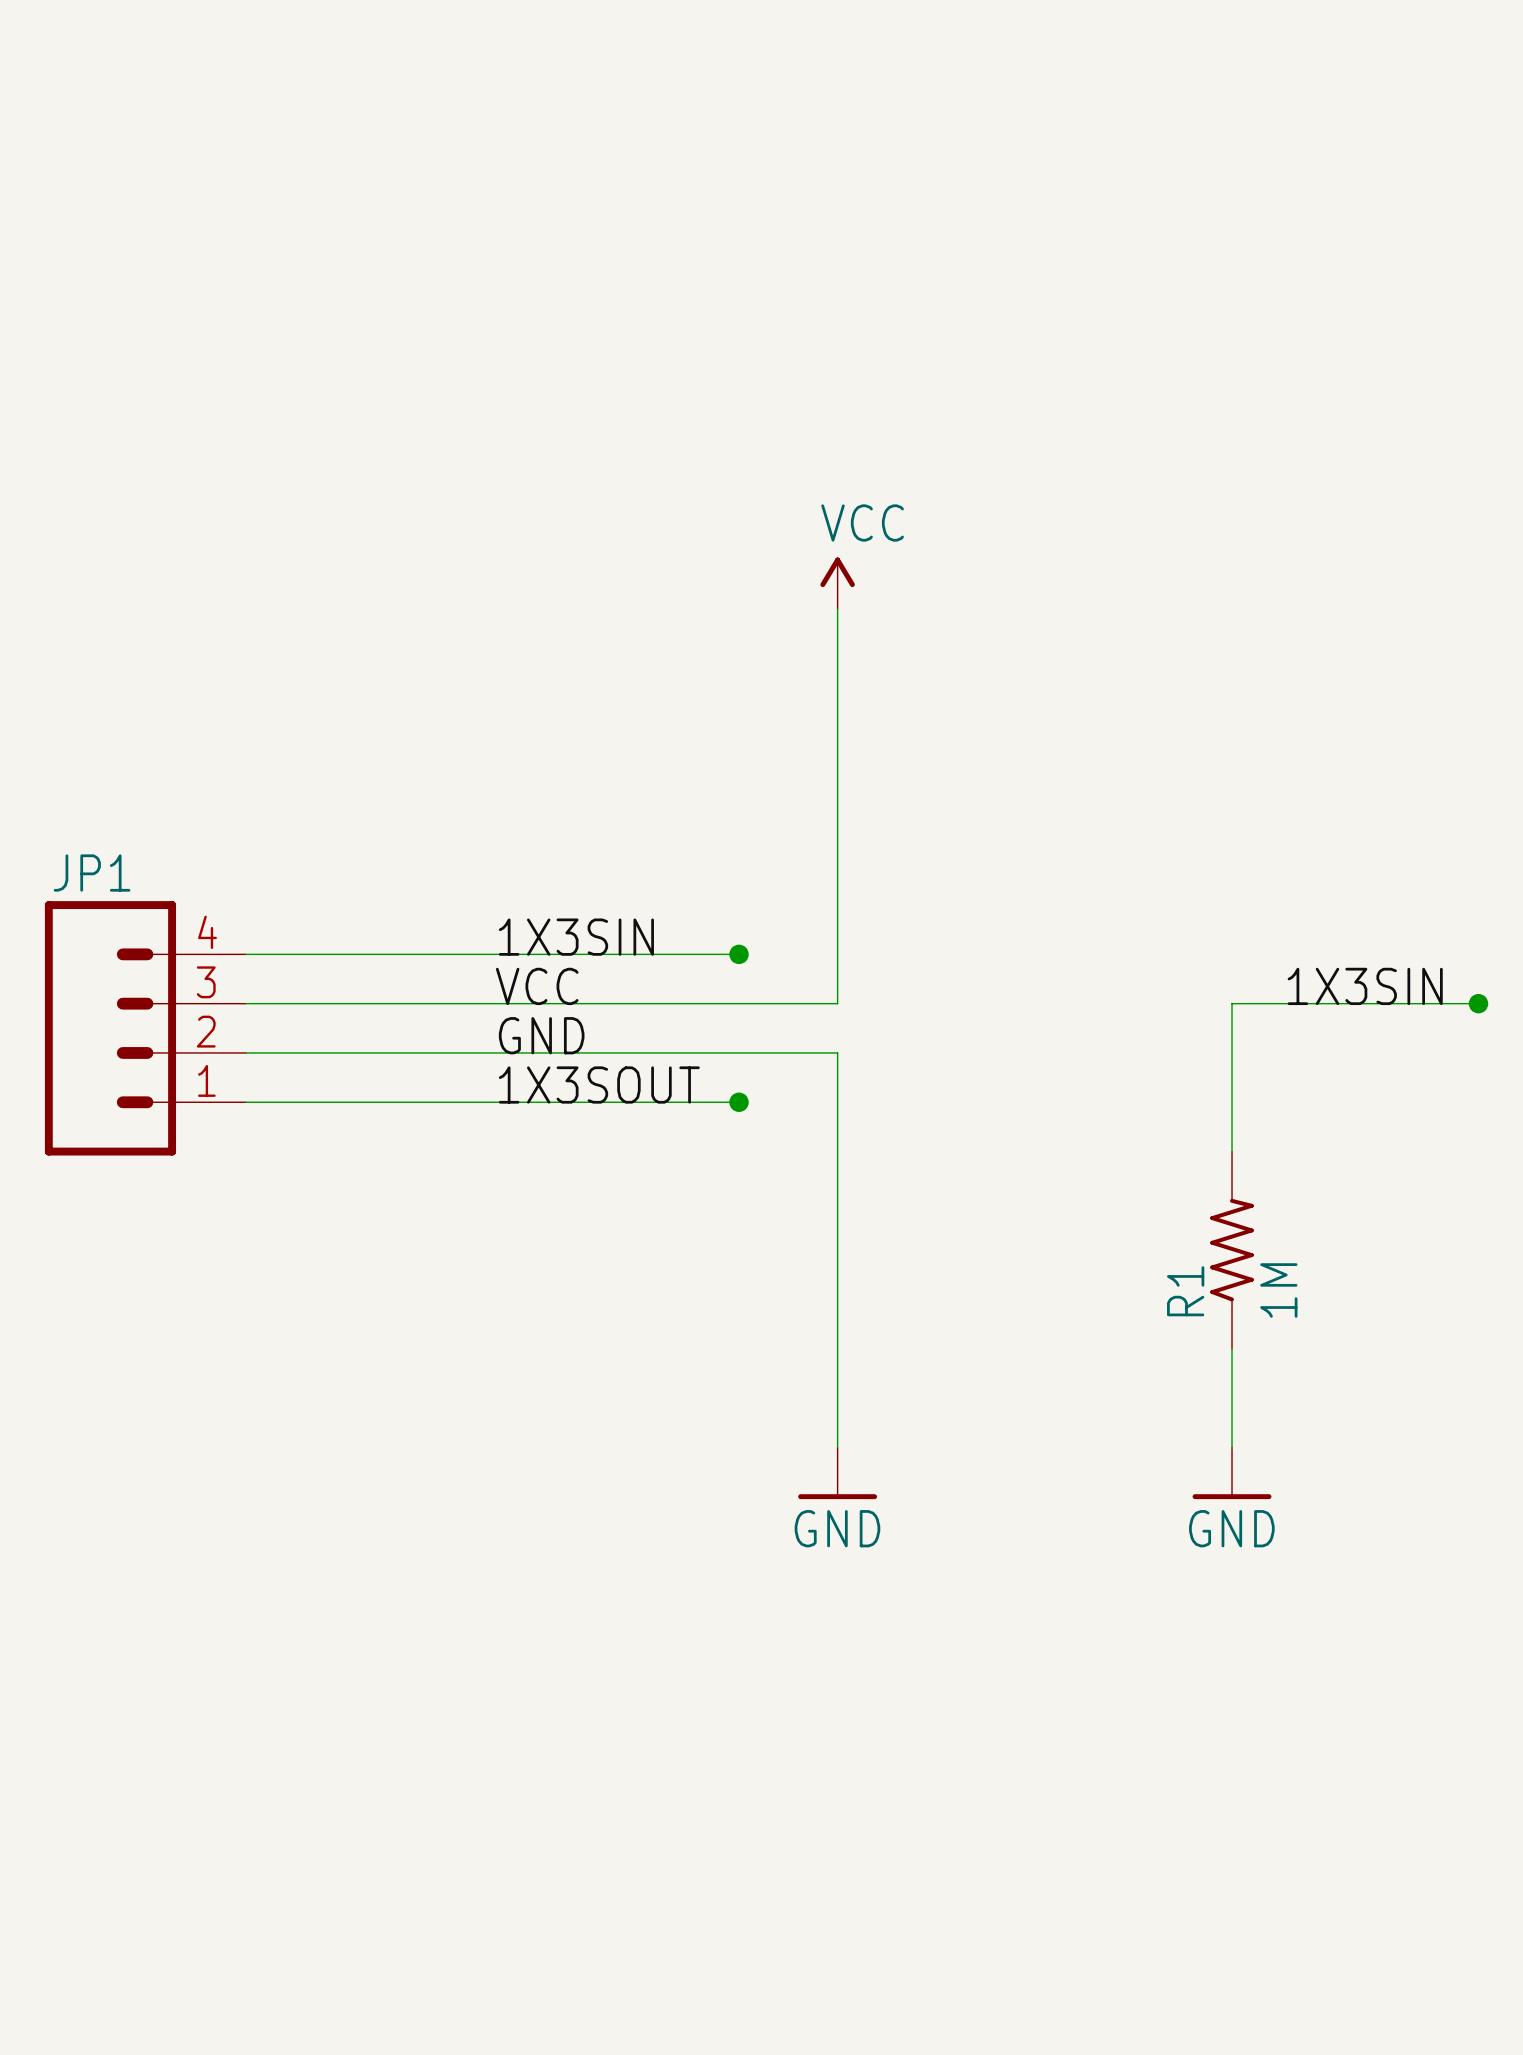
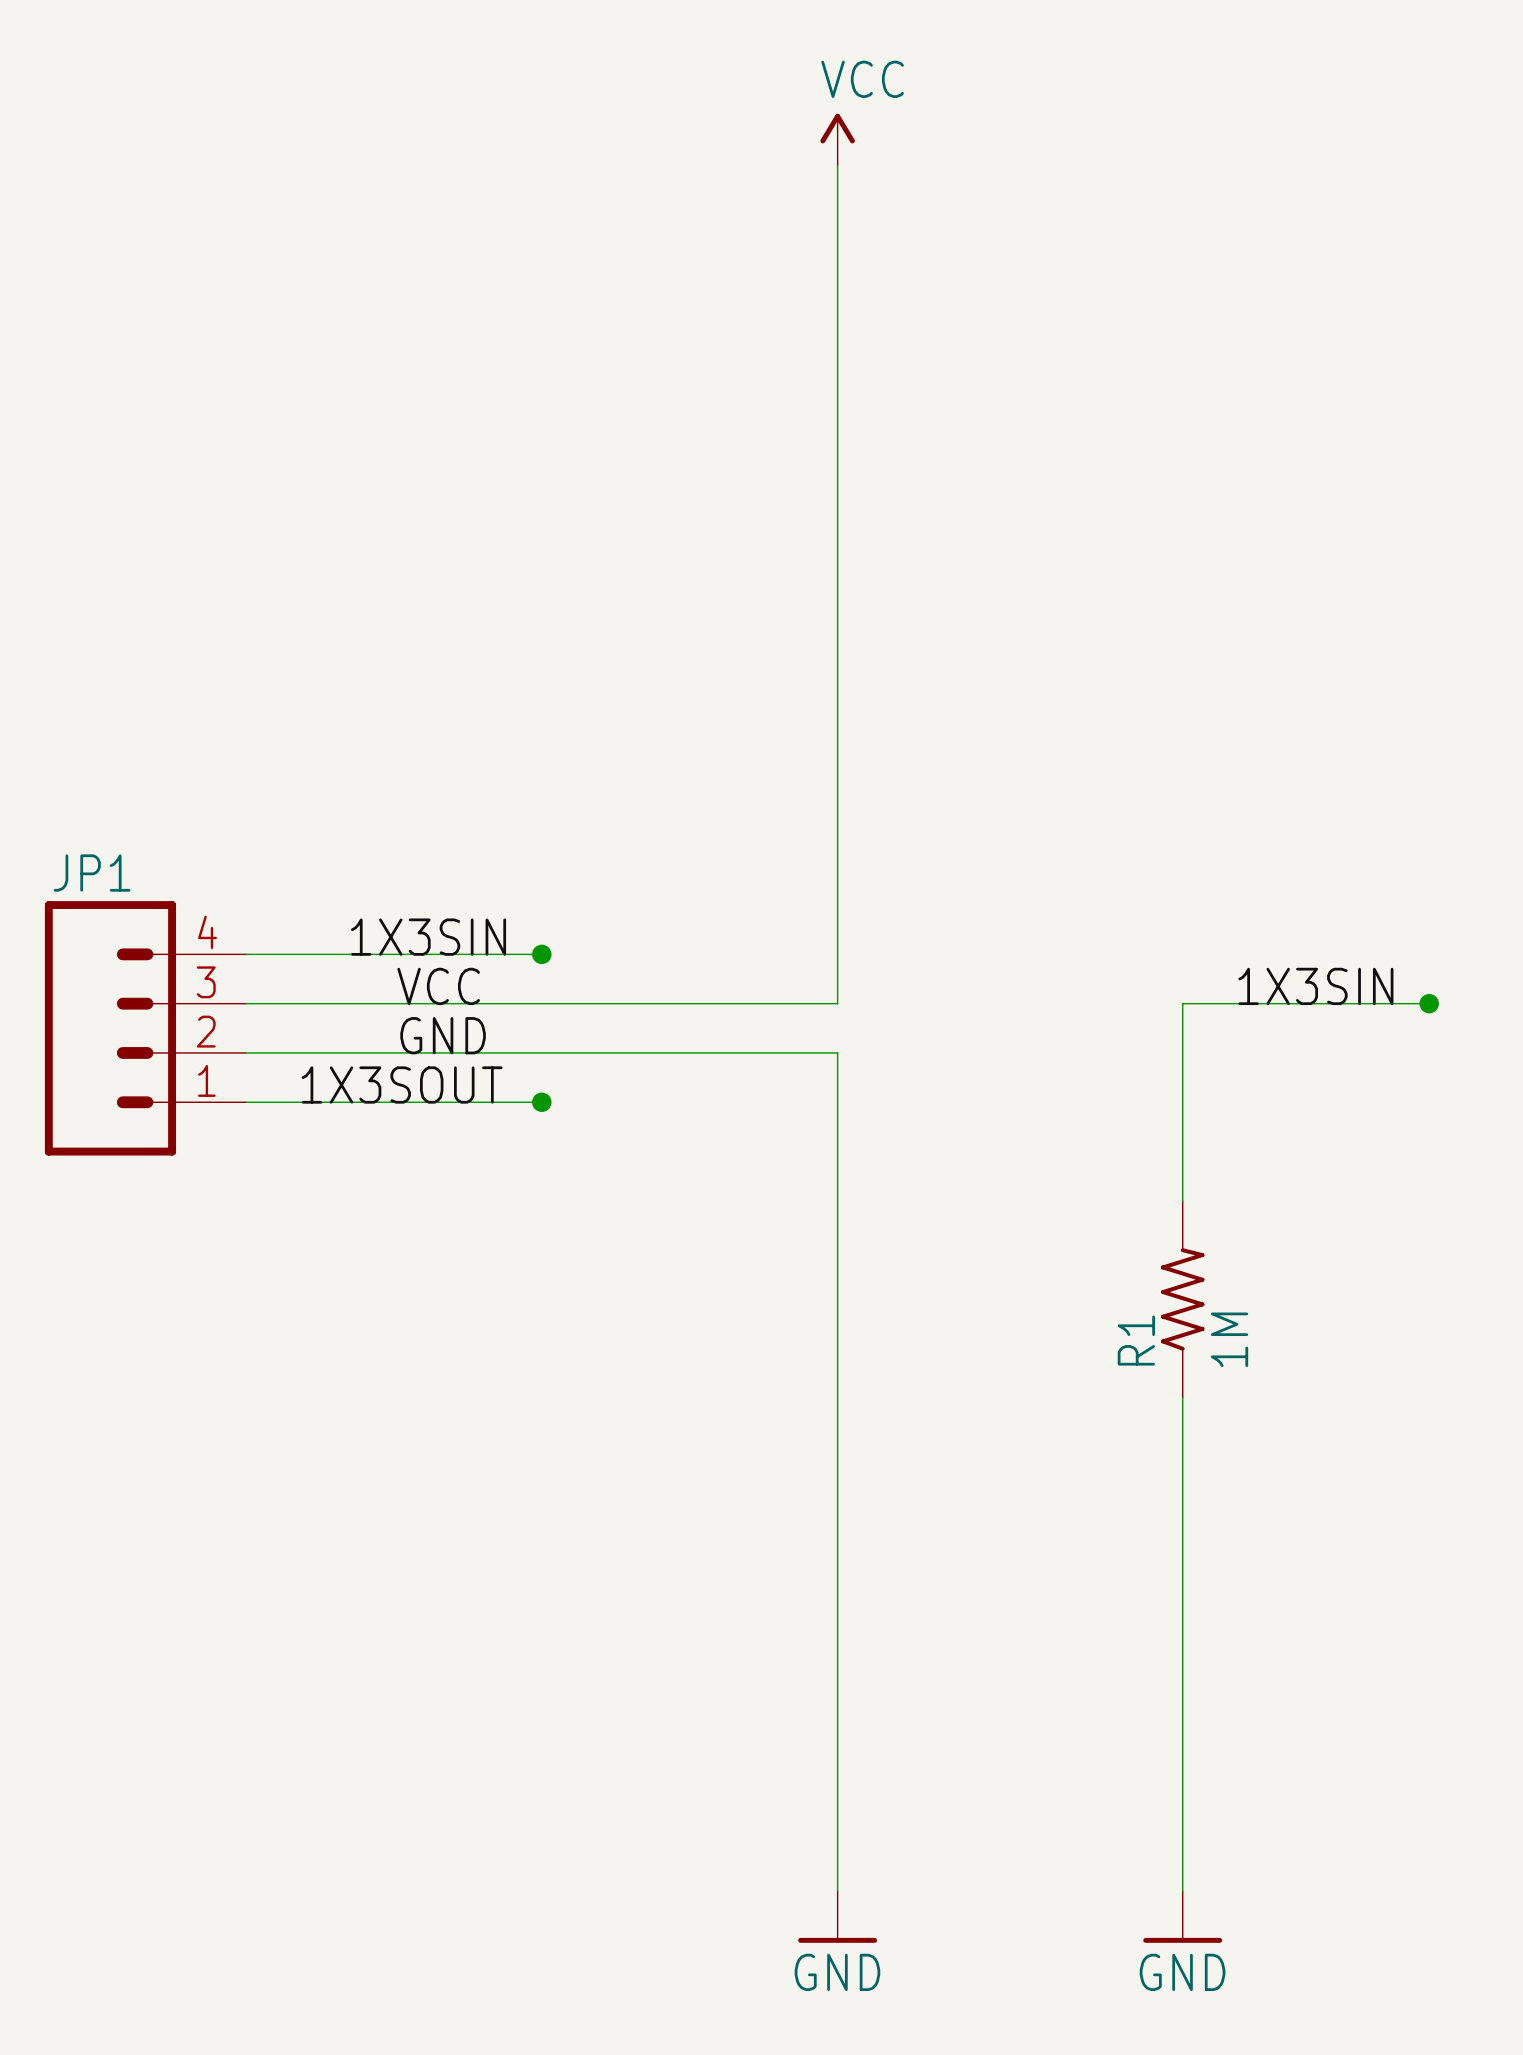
wire: none -> (837, 165) (837, 609)
power symbol position: VCC (837, 583) -> VCC (837, 139)
label position: 1X3SIN (576, 937) -> 1X3SIN (428, 937)
wire: (541, 954) (739, 954) -> none
junction: none -> (541, 954)
junction: (739, 954) -> none
label position: VCC (537, 986) -> VCC (438, 986)
label position: 1X3SIN (1365, 986) -> 1X3SIN (1315, 986)
wire: (1232, 1003) (1232, 1151) -> (1232, 1003) (1182, 1003) (1182, 1200)
wire: (1429, 1003) (1478, 1003) -> none
junction position: (1478, 1003) -> (1429, 1003)
label position: GND (541, 1035) -> GND (443, 1035)
label position: 1X3SOUT (599, 1085) -> 1X3SOUT (402, 1085)
wire: (541, 1102) (739, 1102) -> none
junction: none -> (541, 1102)
junction: (739, 1102) -> none
R1 position: (1232, 1250) -> (1182, 1299)
wire: (1232, 1348) (1232, 1447) -> none
wire: none -> (1182, 1398) (1182, 1891)
wire: none -> (837, 1447) (837, 1891)
power symbol: GND (837, 1473) -> none
power symbol: GND (1232, 1473) -> none
power symbol: none -> GND (837, 1916)
power symbol: none -> GND (1182, 1916)

